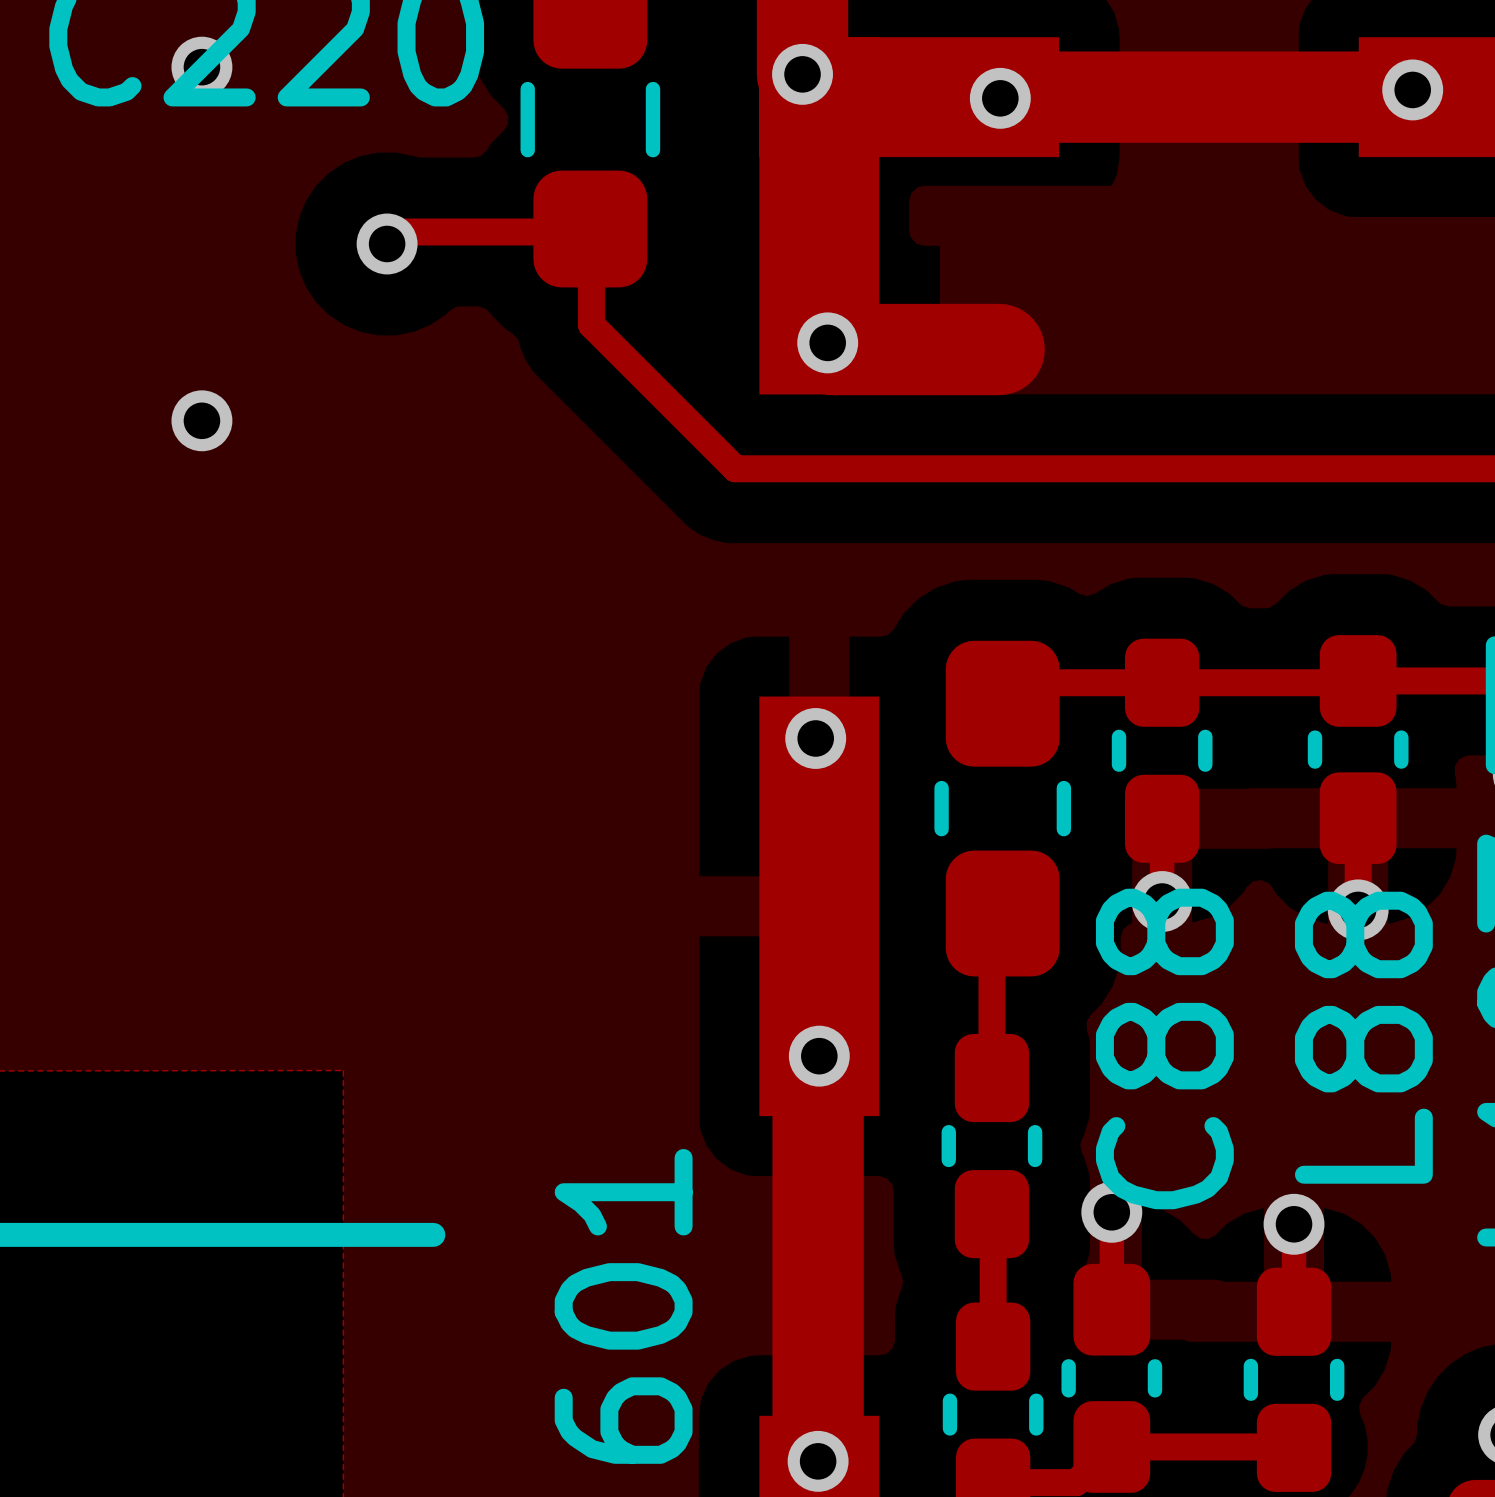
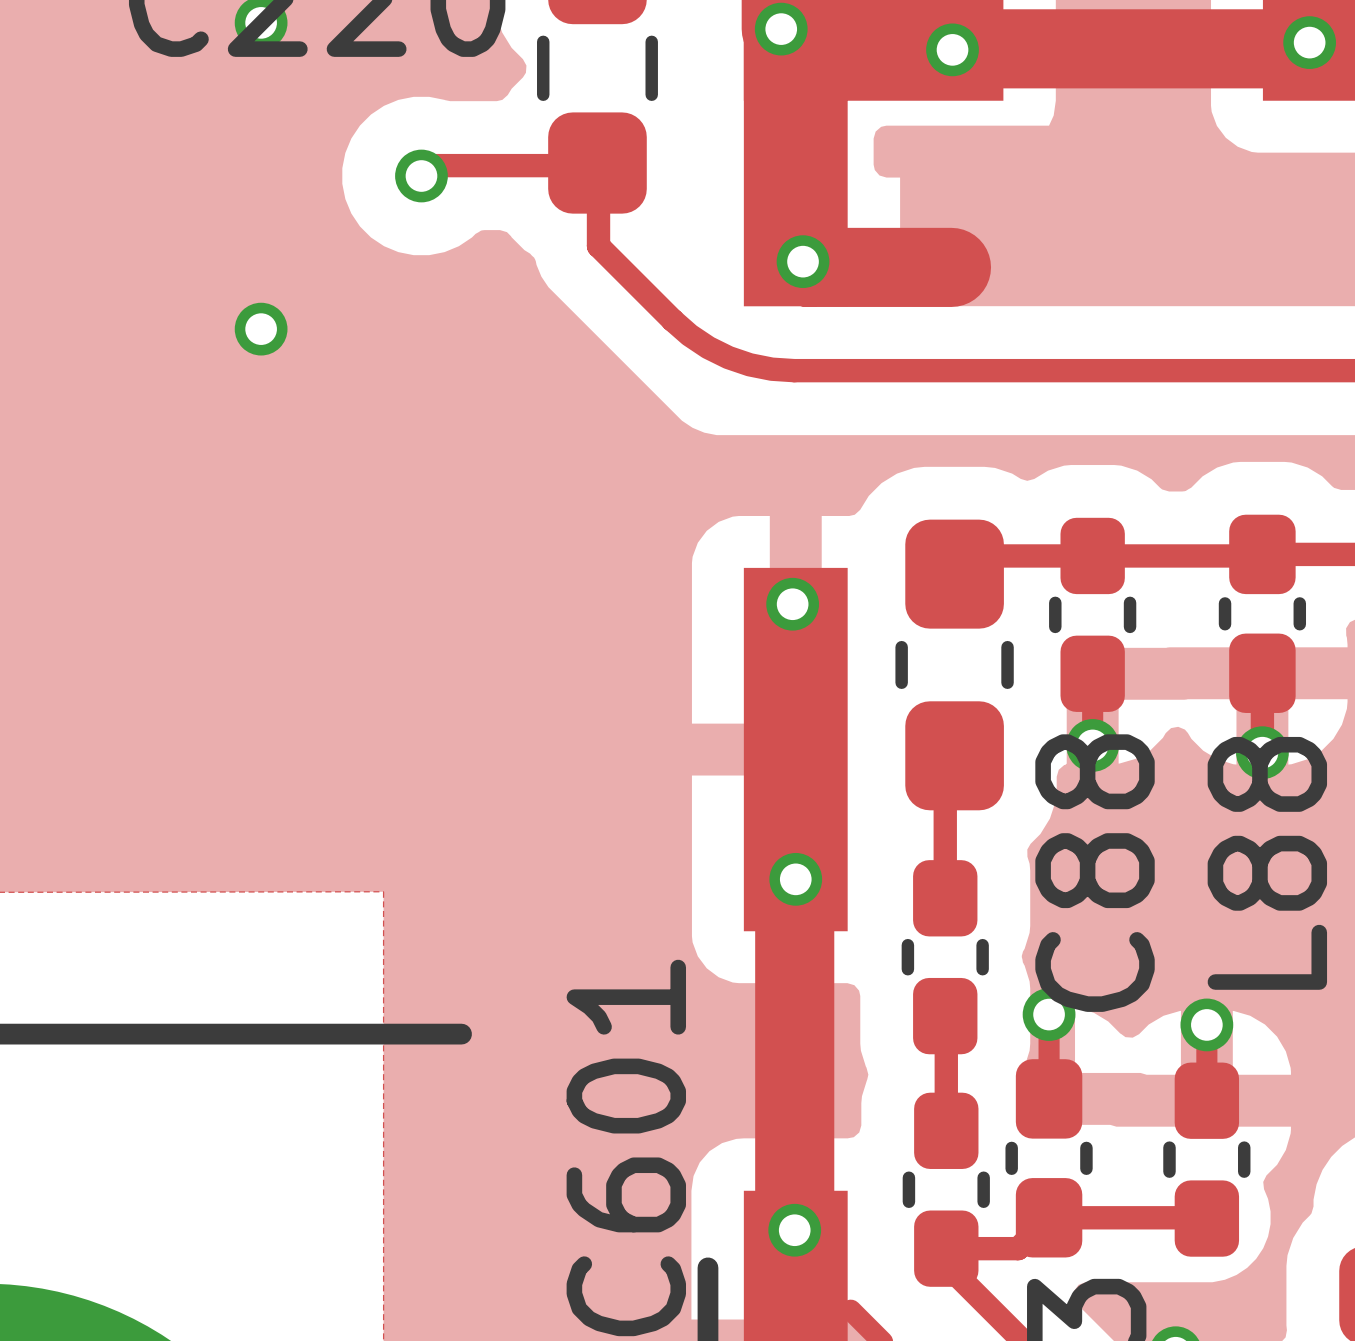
track: (677, 410) (735, 468) (817, 468) -> (672, 320) (708, 347) (728, 357) (749, 364) (794, 370)

